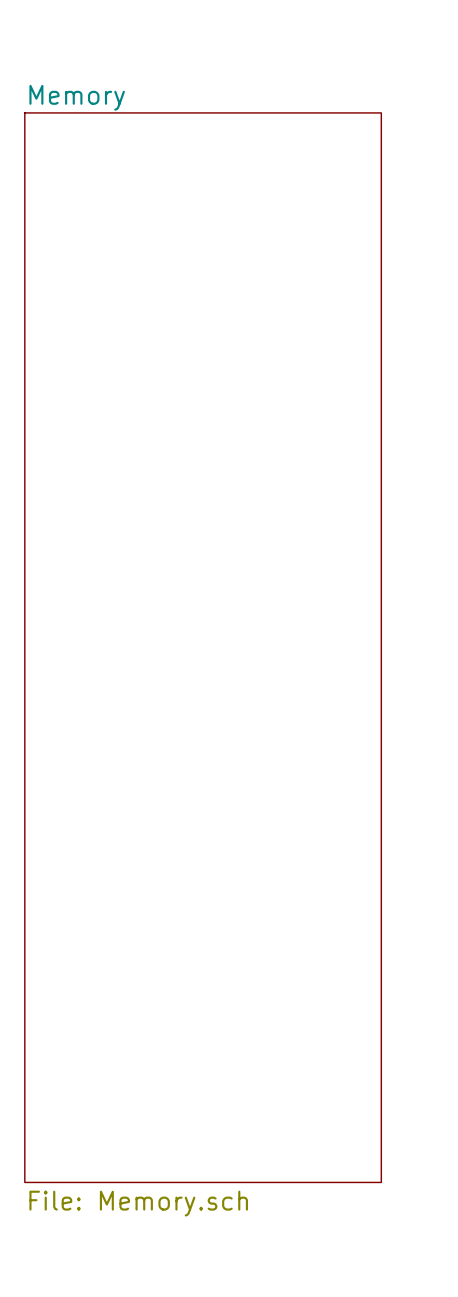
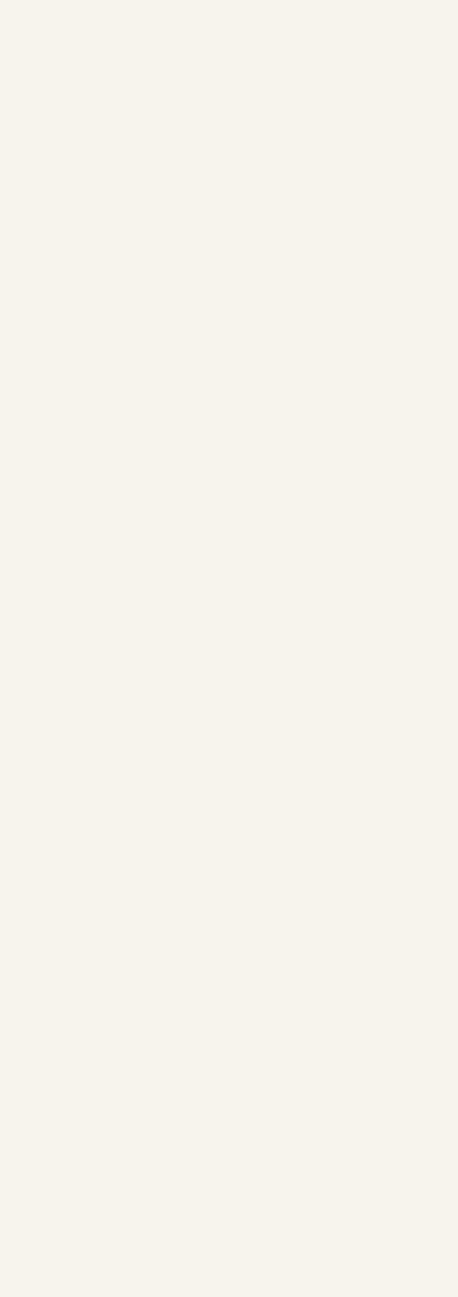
sheet Memory: File: Memory.sch (203, 647) -> none

